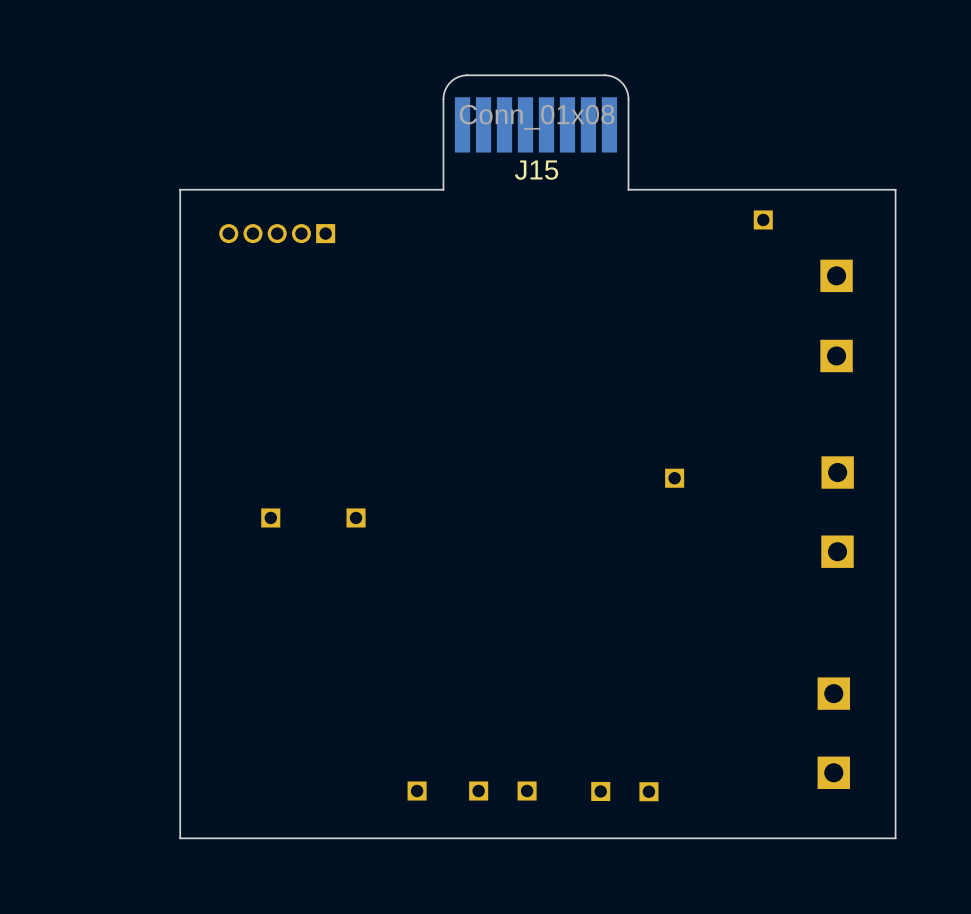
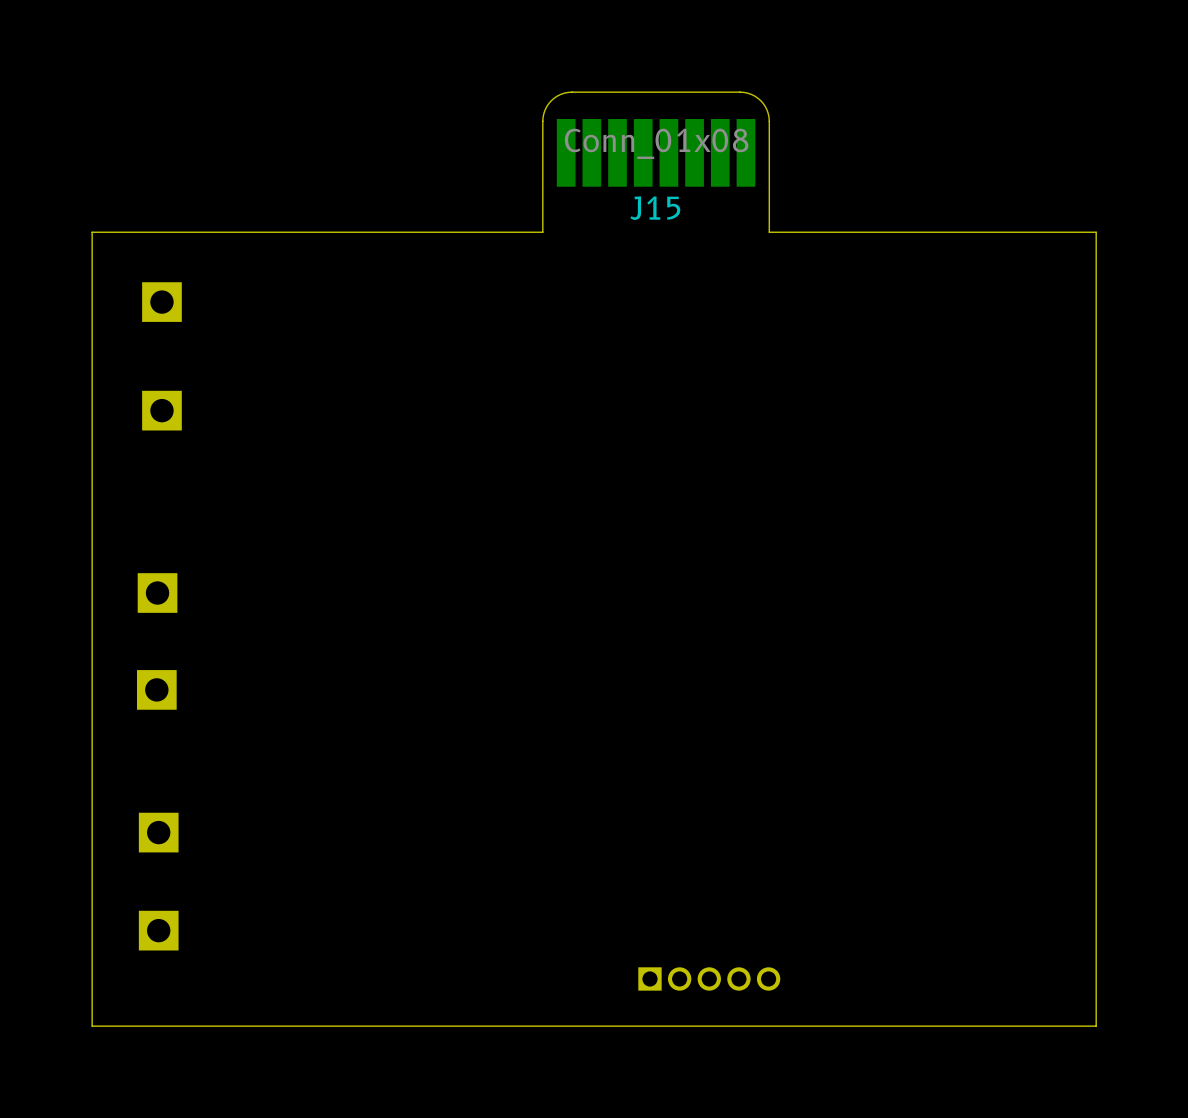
board edge: (180, 189) (180, 838) -> (220, 232) (92, 232) (92, 1026) (220, 1026)
part: (763, 219) -> none
part: (277, 233) -> none
part: none -> (161, 302)
part: (836, 275) -> none
part: none -> (161, 410)
part: (836, 355) -> none
part: (837, 472) -> none
part: (674, 478) -> none
part: none -> (157, 593)
part: (270, 517) -> none
part: (356, 517) -> none
part: (837, 551) -> none
part: none -> (156, 689)
part: none -> (158, 832)
part: (833, 693) -> none
part: none -> (158, 930)
part: (833, 772) -> none
part: (417, 791) -> none
part: (478, 791) -> none
part: (527, 791) -> none
part: (600, 791) -> none
part: (648, 791) -> none
part: none -> (709, 978)

